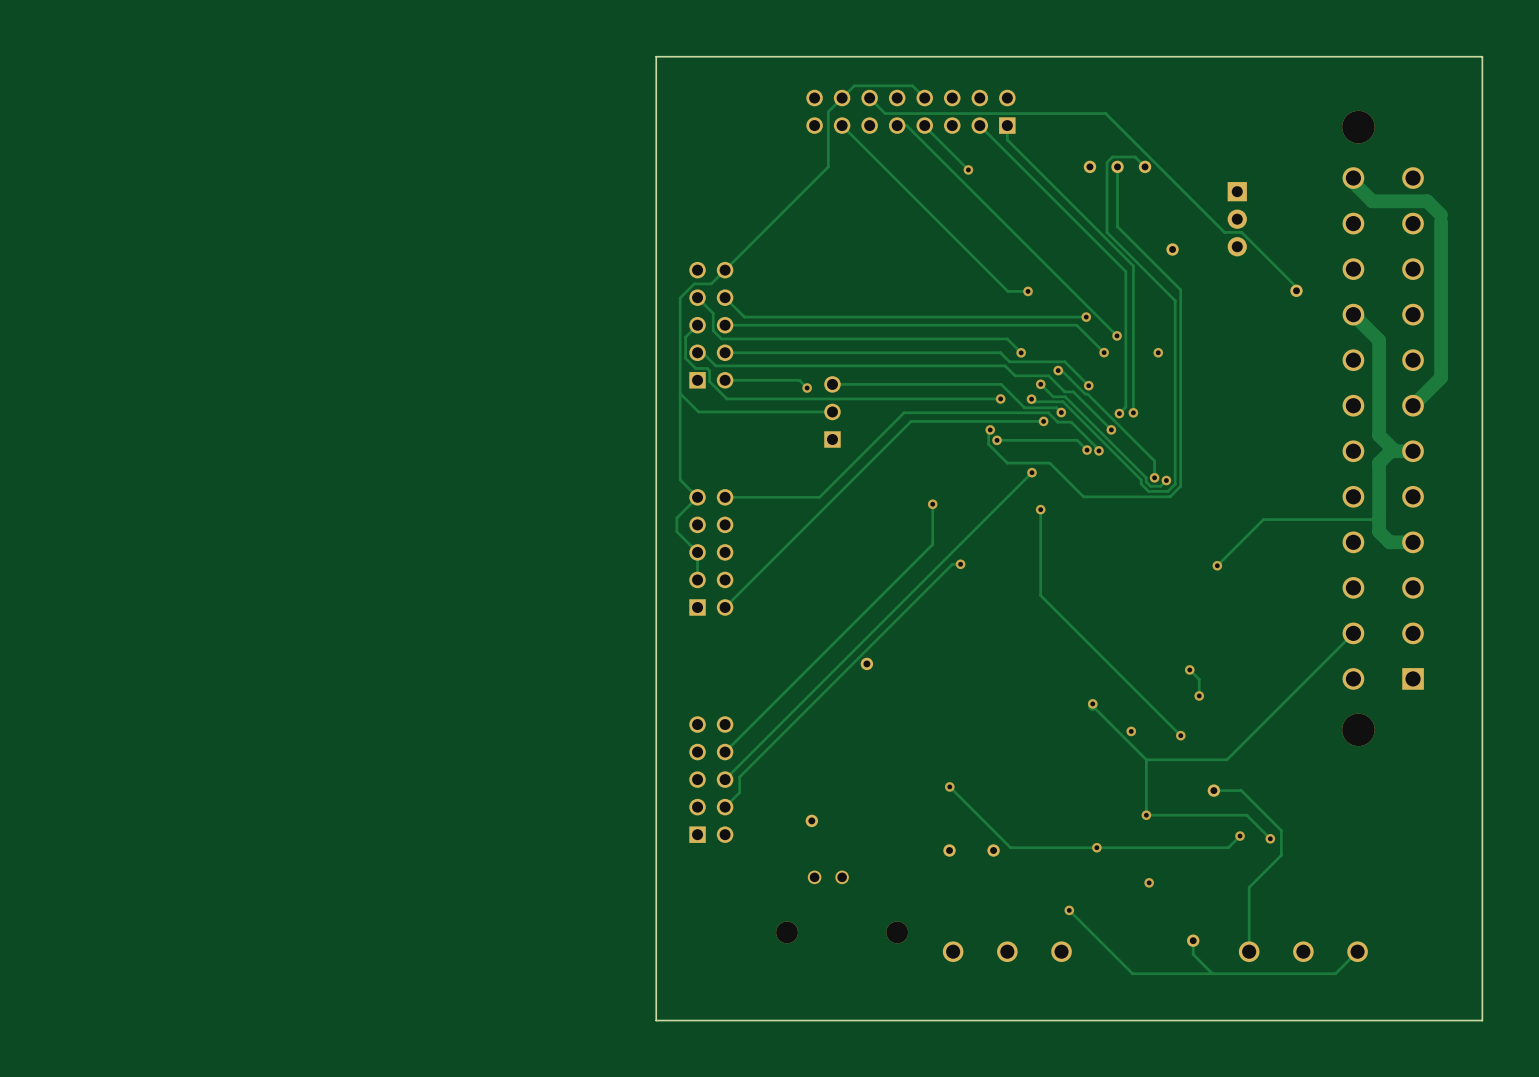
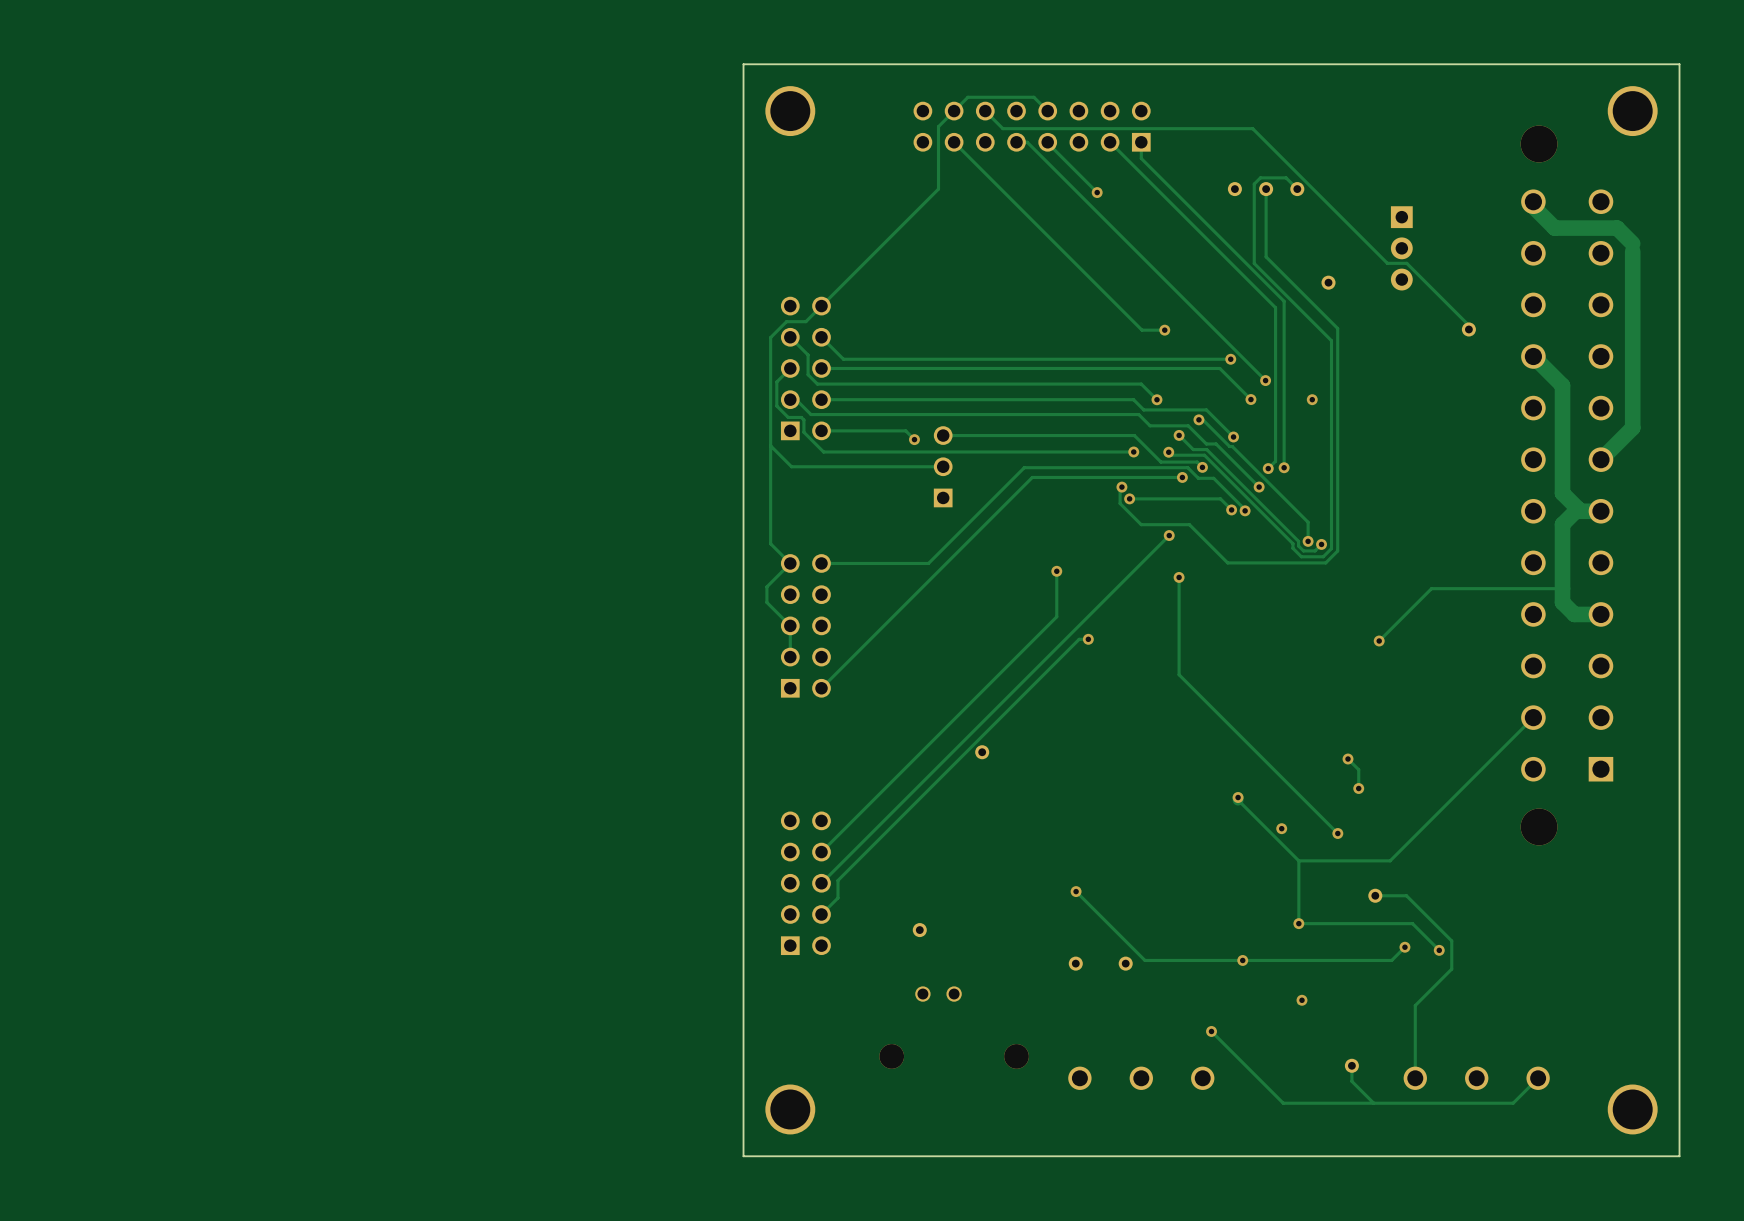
part: none -> (790, 111)
part: none -> (1632, 111)
part: none -> (790, 1109)
part: none -> (1632, 1109)

